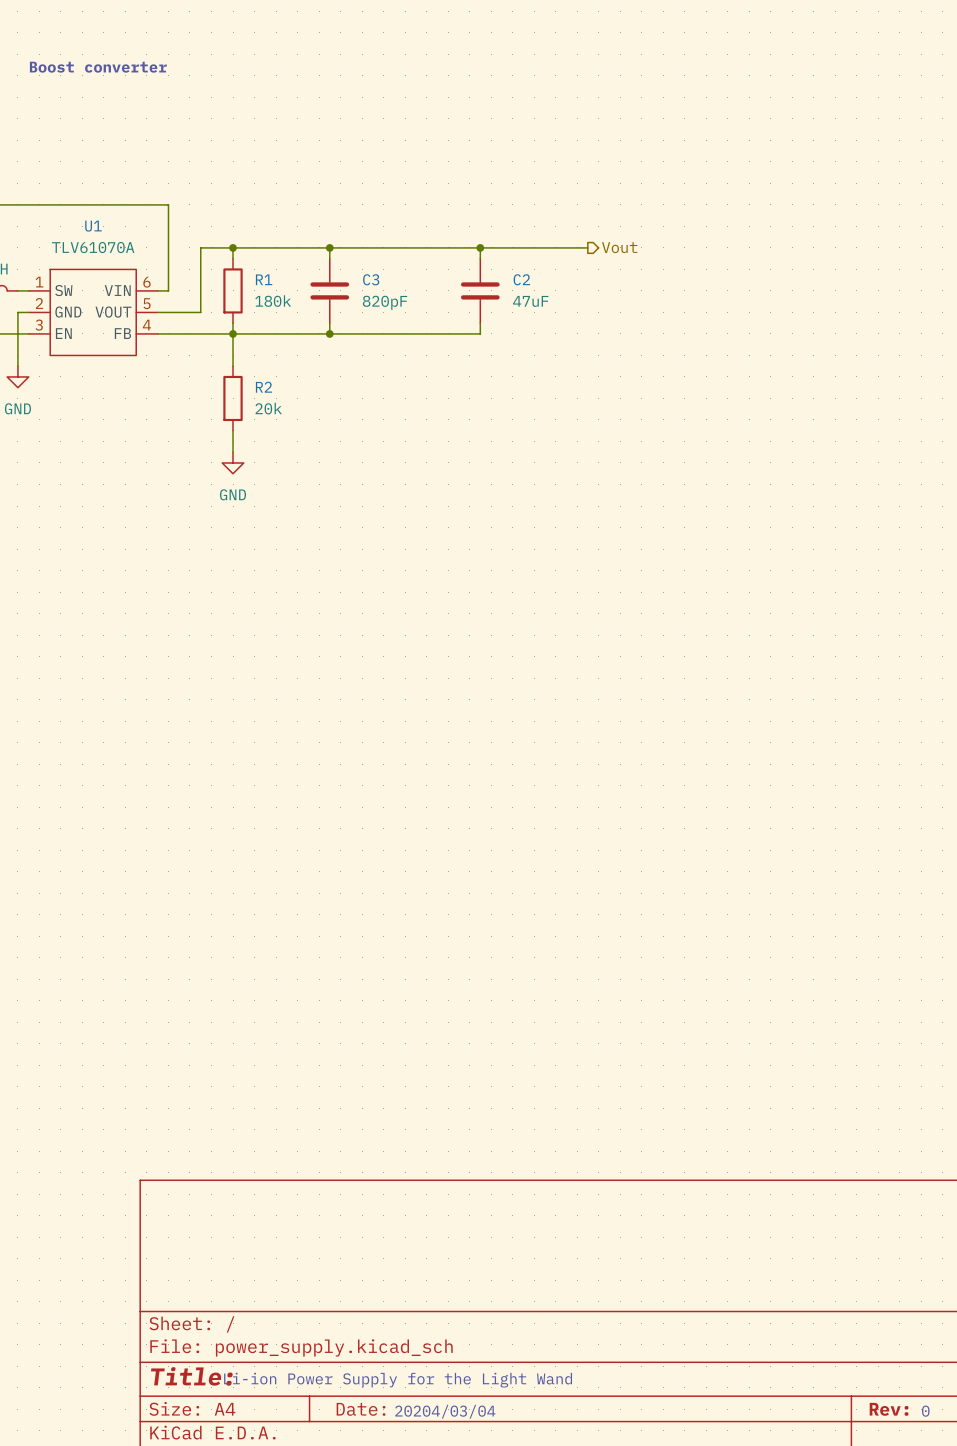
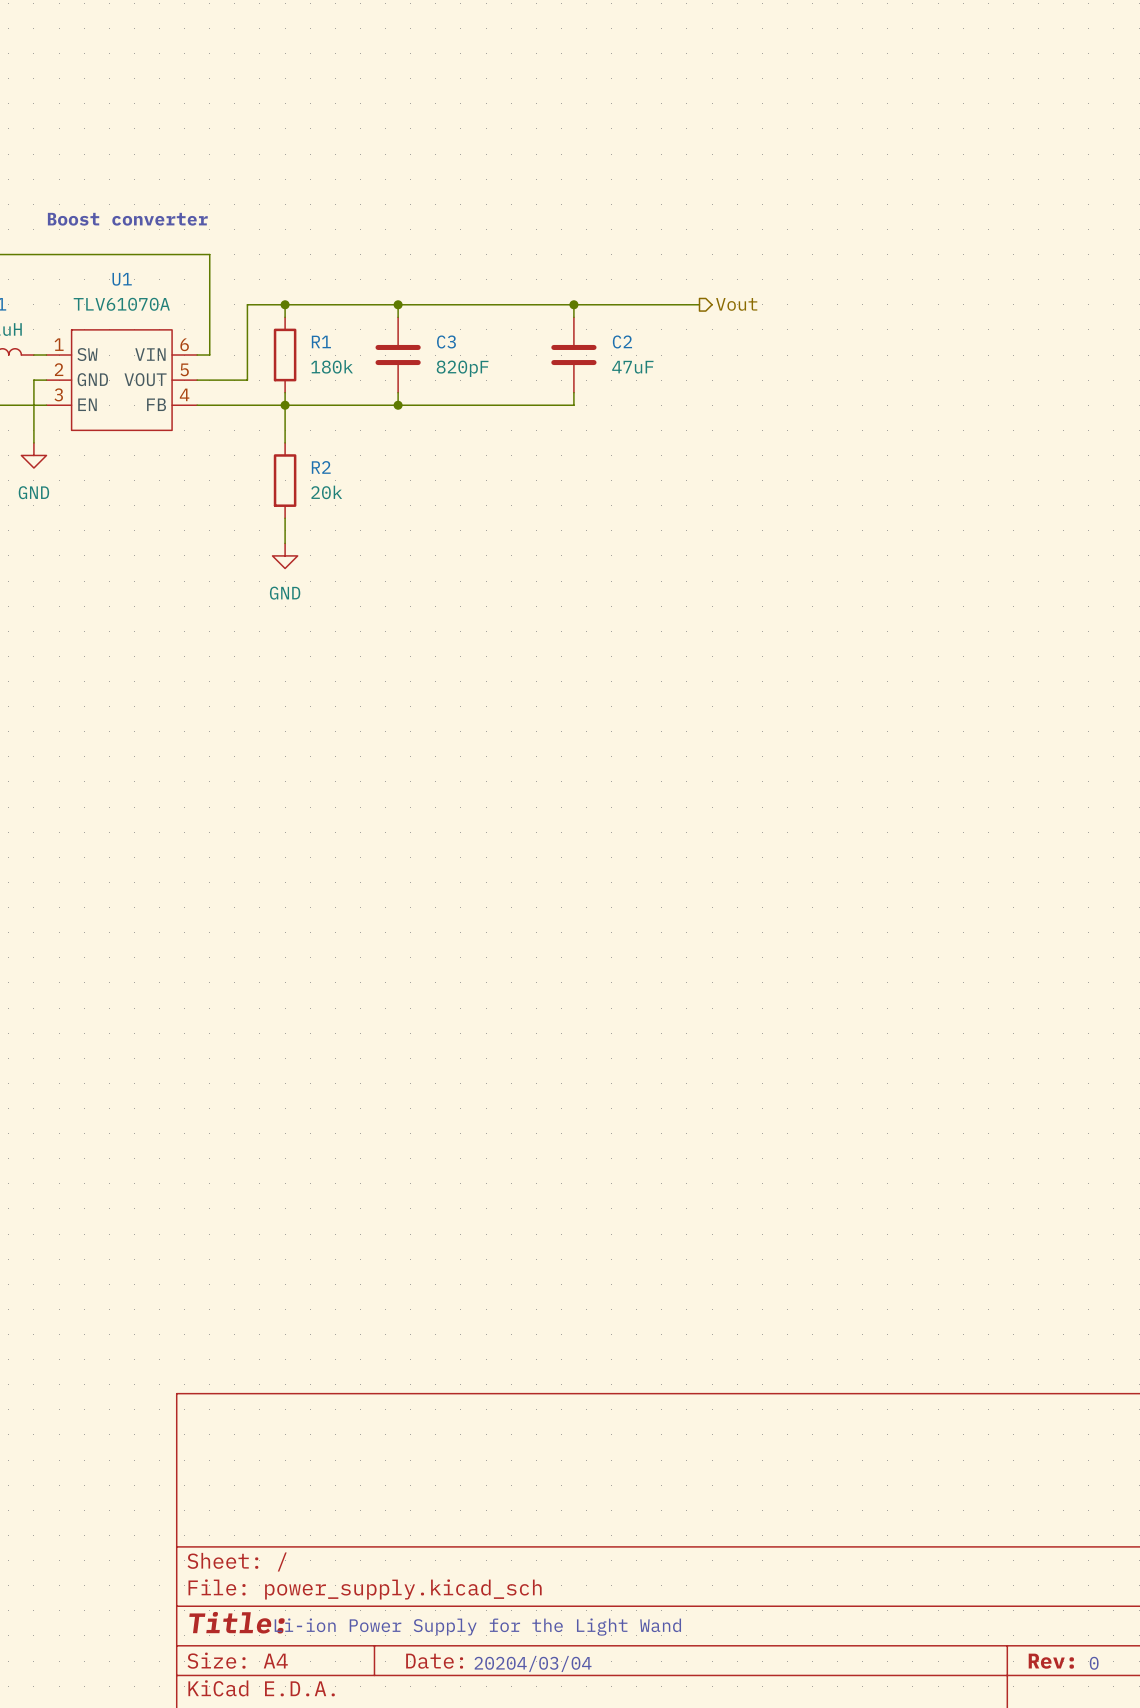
text position: Boost converter (98, 67) -> Boost converter (127, 219)

